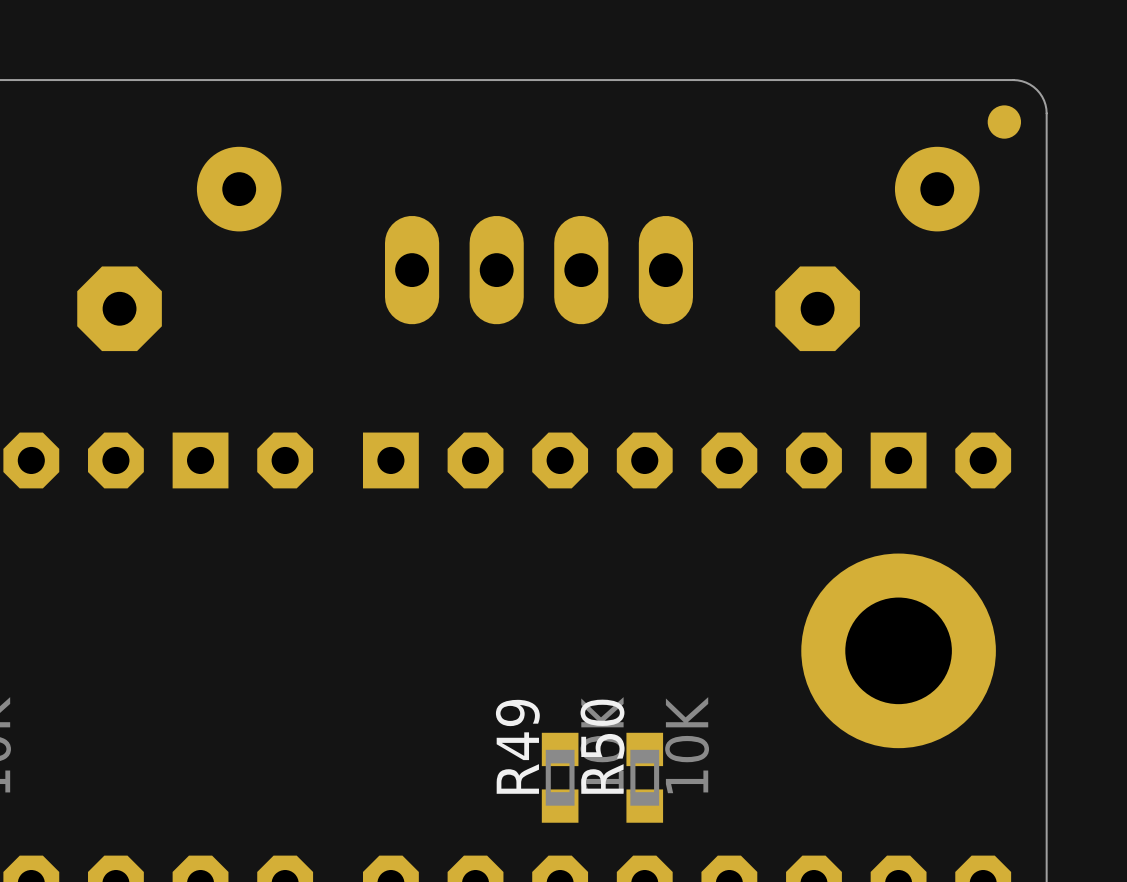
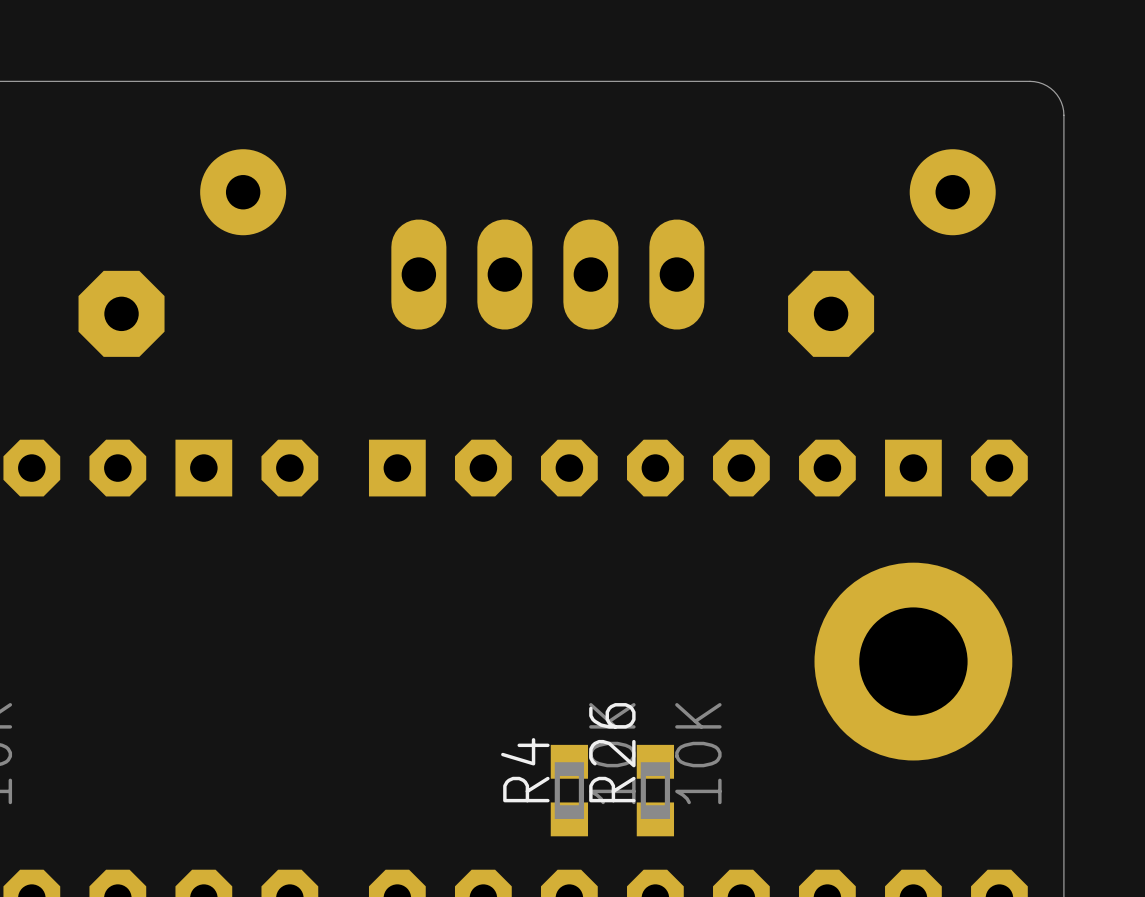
part: (1004, 122) -> none
R49 name: R49 (517, 746) -> R4 (525, 770)
R50 name: R50 (602, 746) -> R26 (612, 752)

